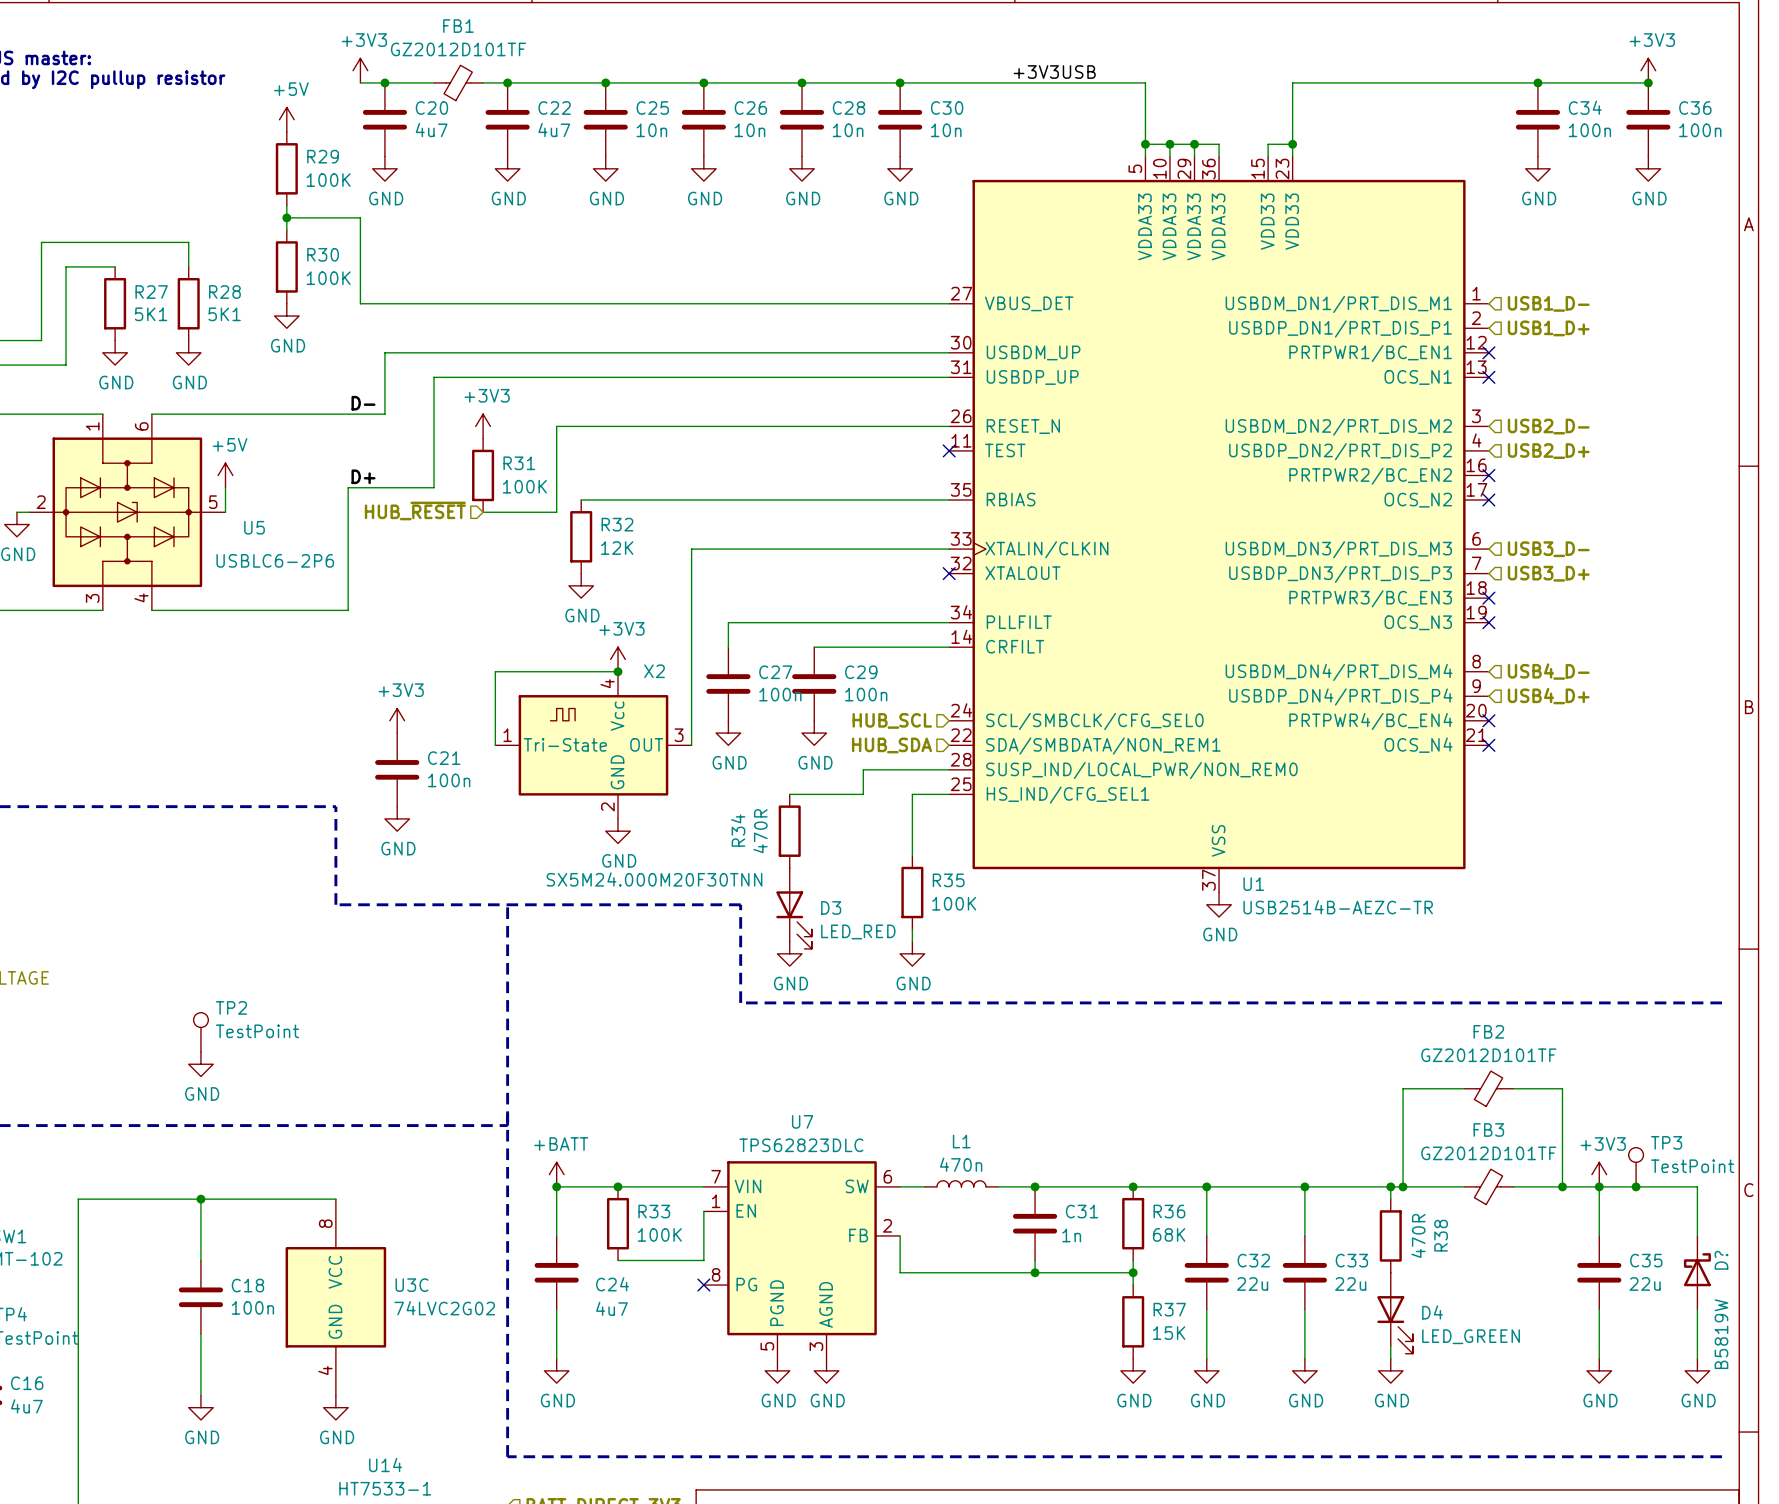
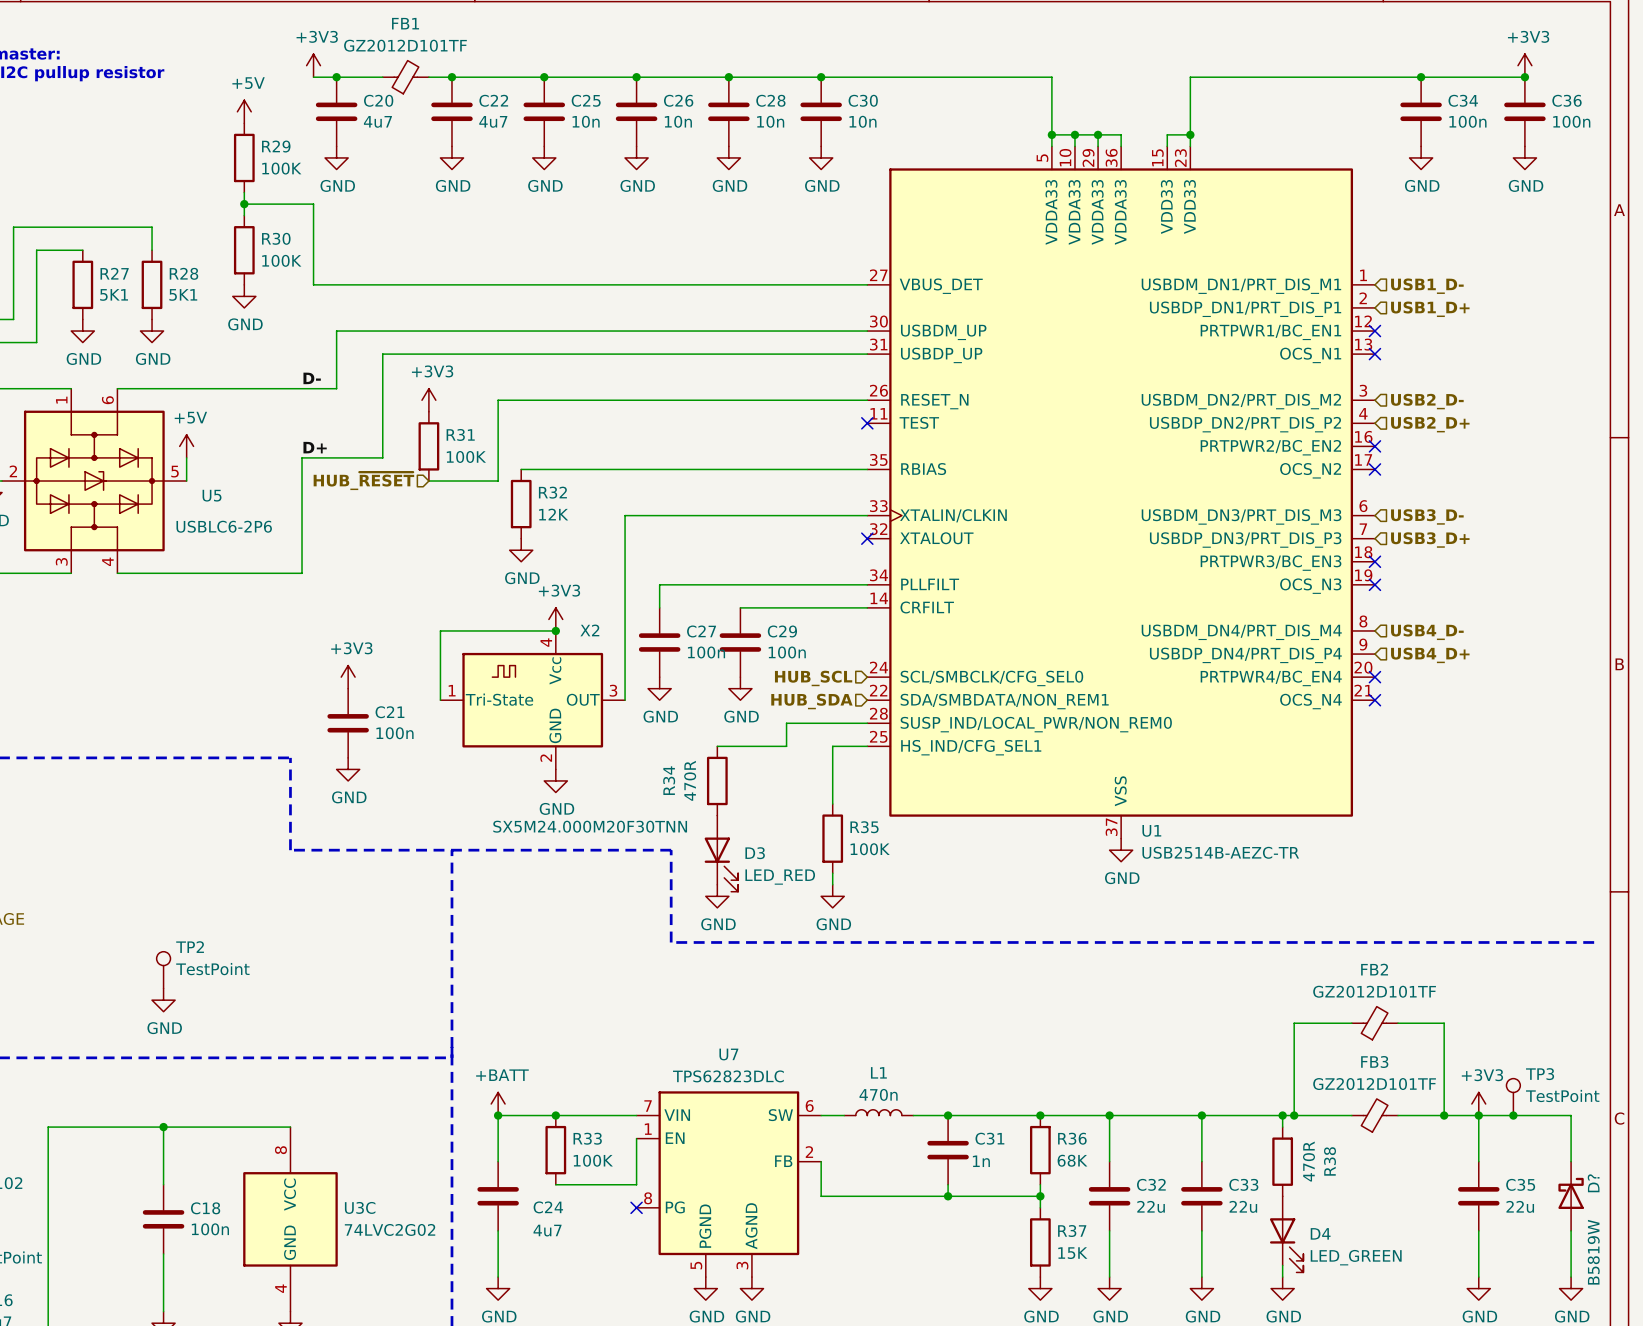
label: +3V3USB (1054, 72) -> none

